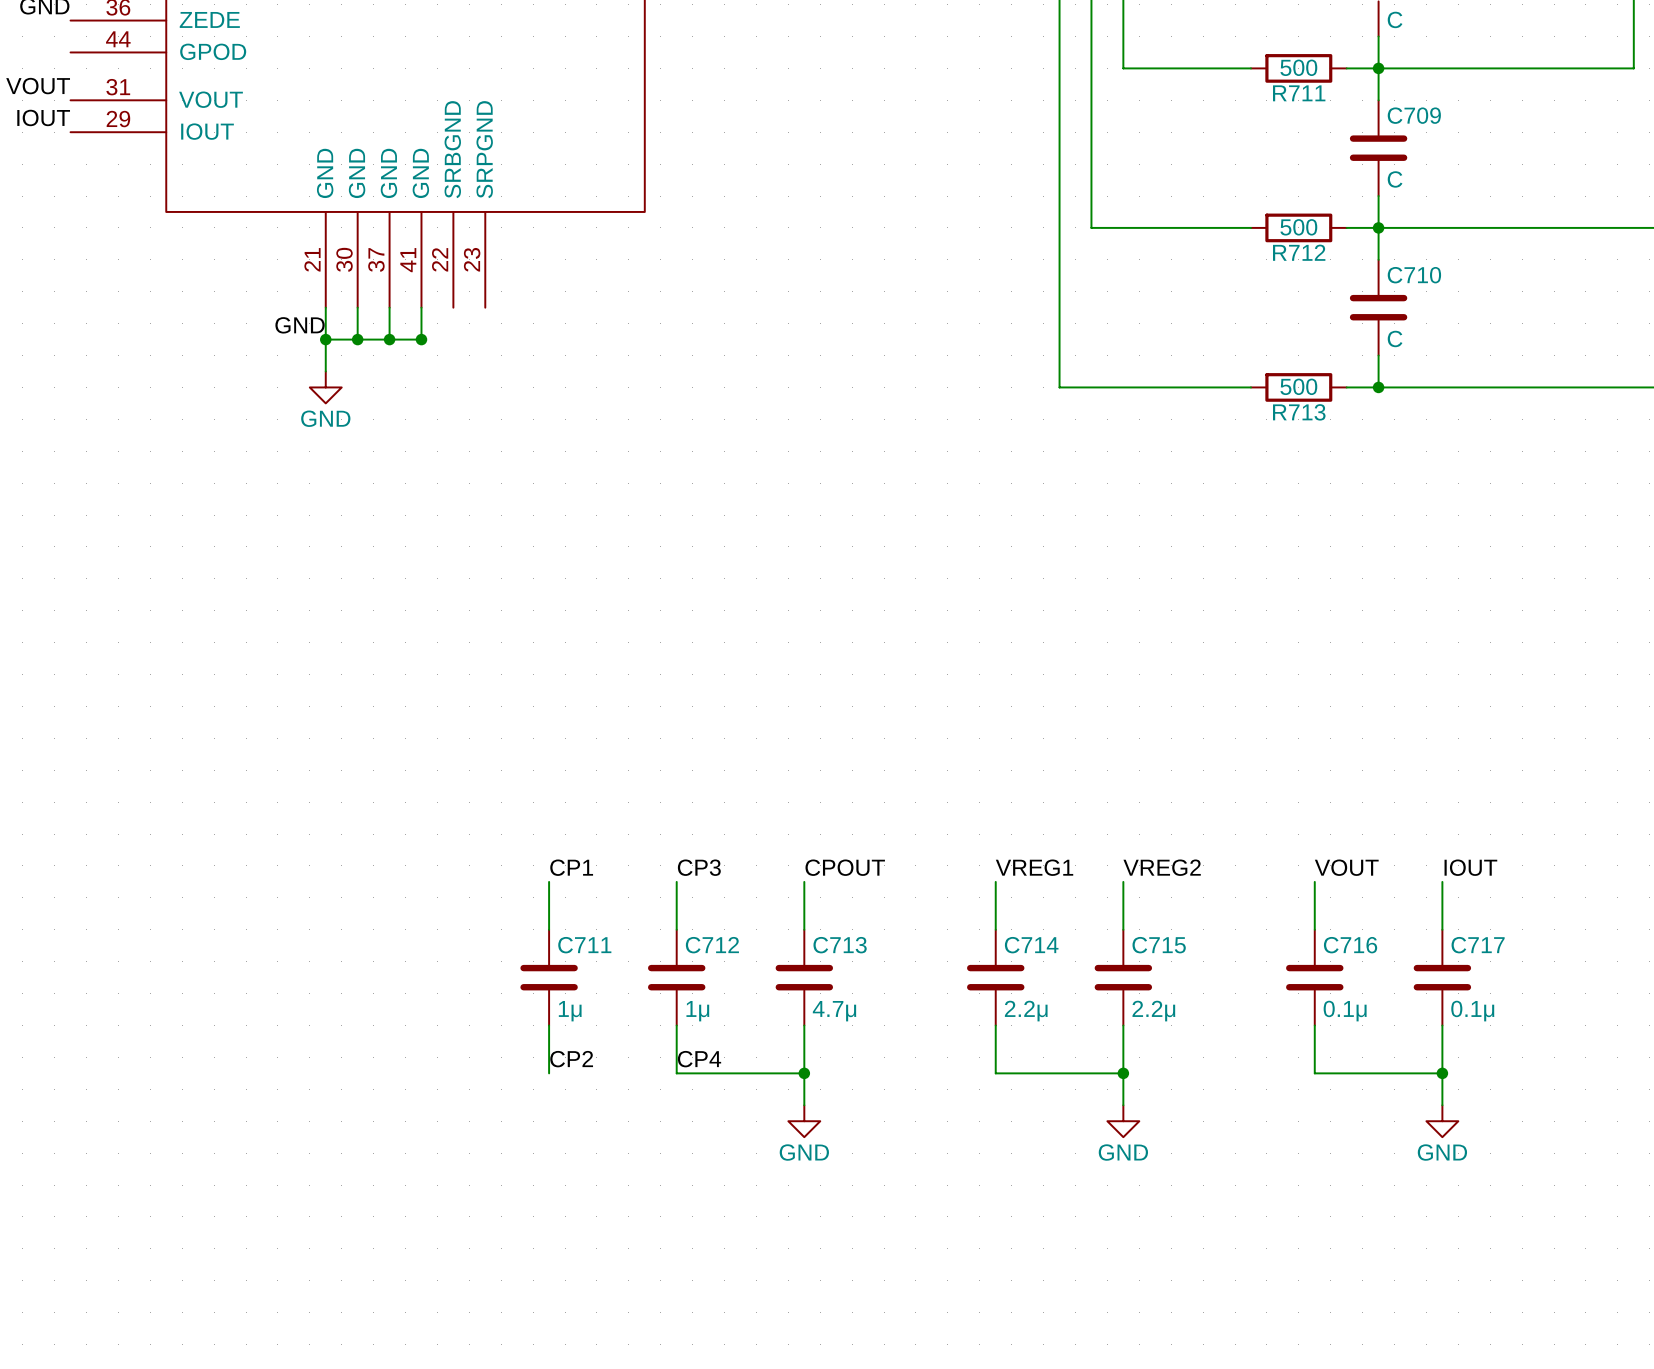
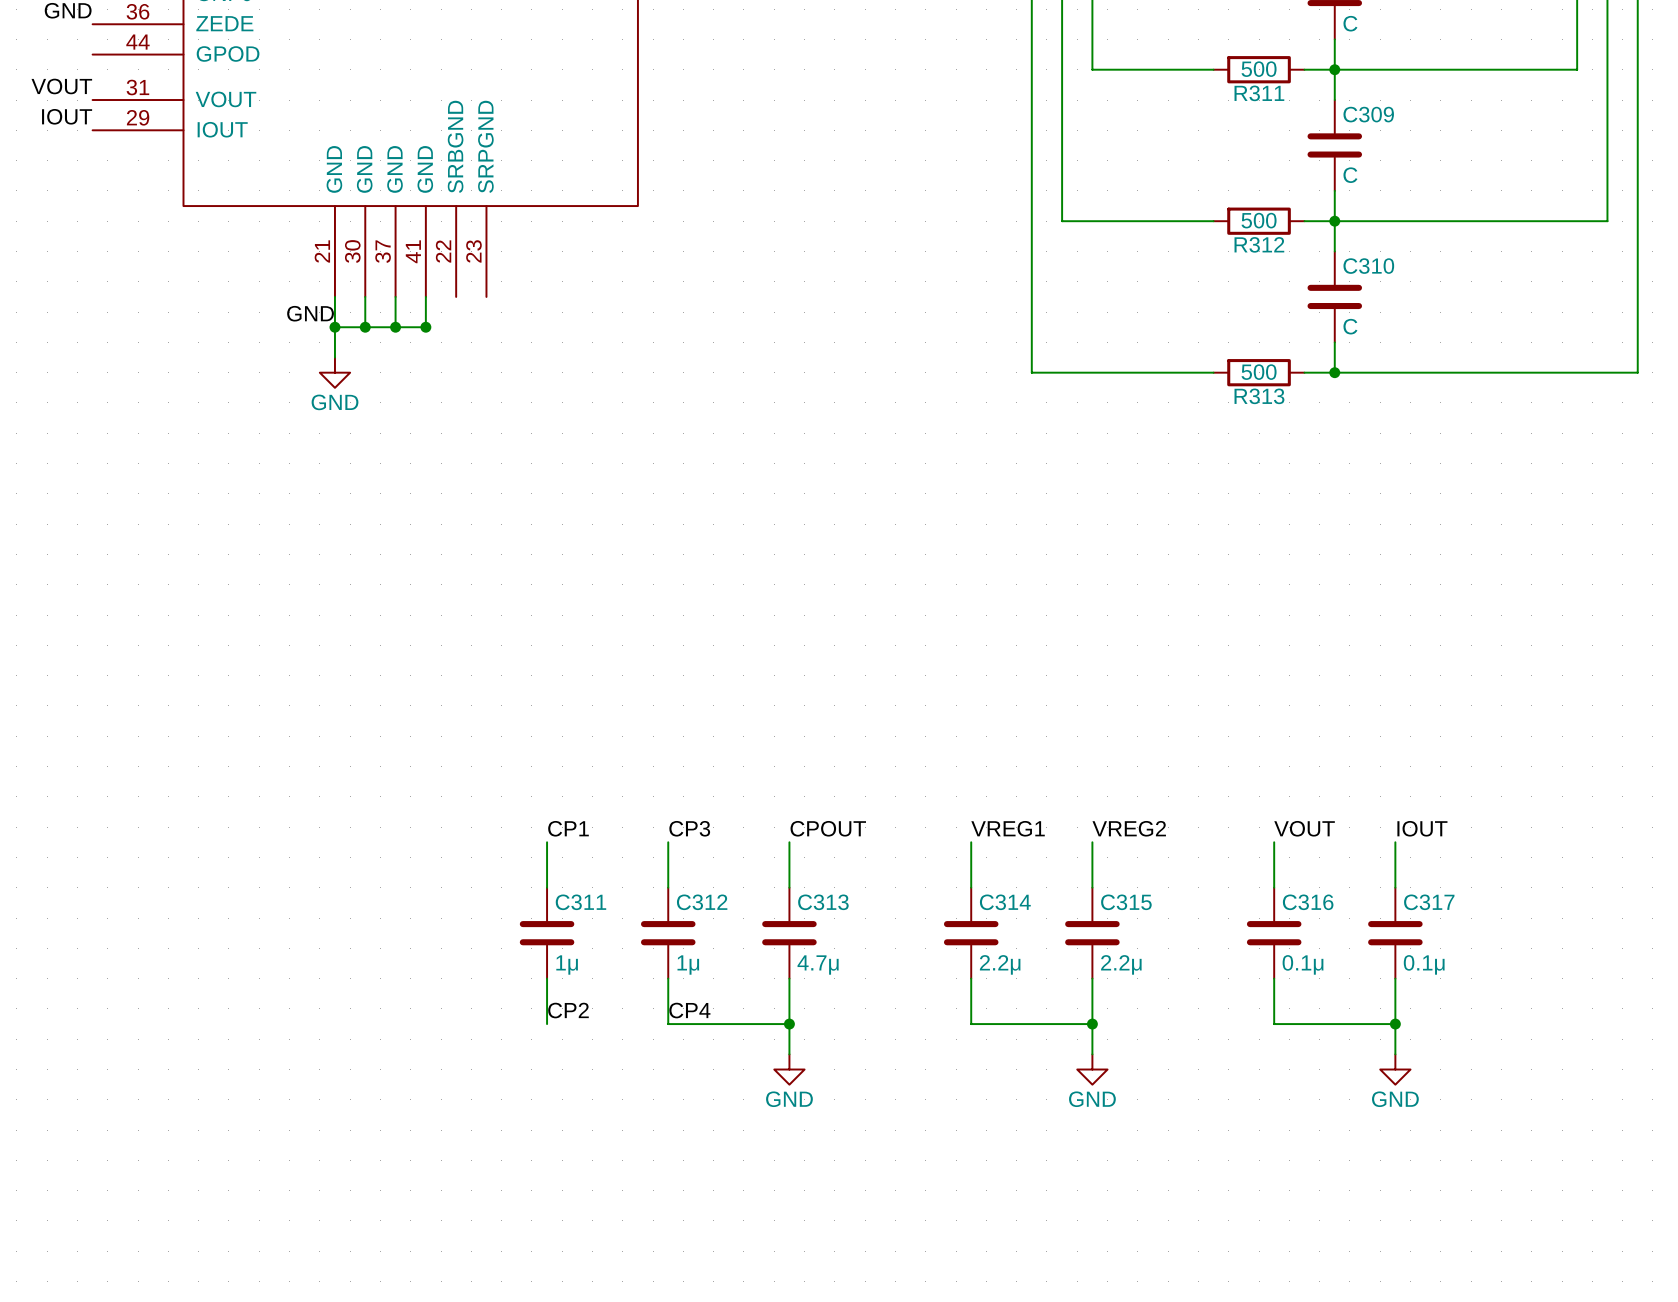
R711 name: R711 (1299, 93) -> R311 (1259, 93)
C709 name: C709 (1414, 115) -> C309 (1368, 114)
R712 name: R712 (1299, 252) -> R312 (1259, 244)
C710 name: C710 (1414, 275) -> C310 (1368, 266)
R713 name: R713 (1299, 412) -> R313 (1259, 396)
C711 name: C711 (584, 945) -> C311 (580, 902)
C712 name: C712 (712, 945) -> C312 (702, 902)
C713 name: C713 (840, 945) -> C313 (823, 902)
C714 name: C714 (1031, 945) -> C314 (1005, 902)
C715 name: C715 (1159, 945) -> C315 (1126, 902)
C716 name: C716 (1350, 945) -> C316 (1308, 902)
C717 name: C717 (1478, 945) -> C317 (1429, 902)

